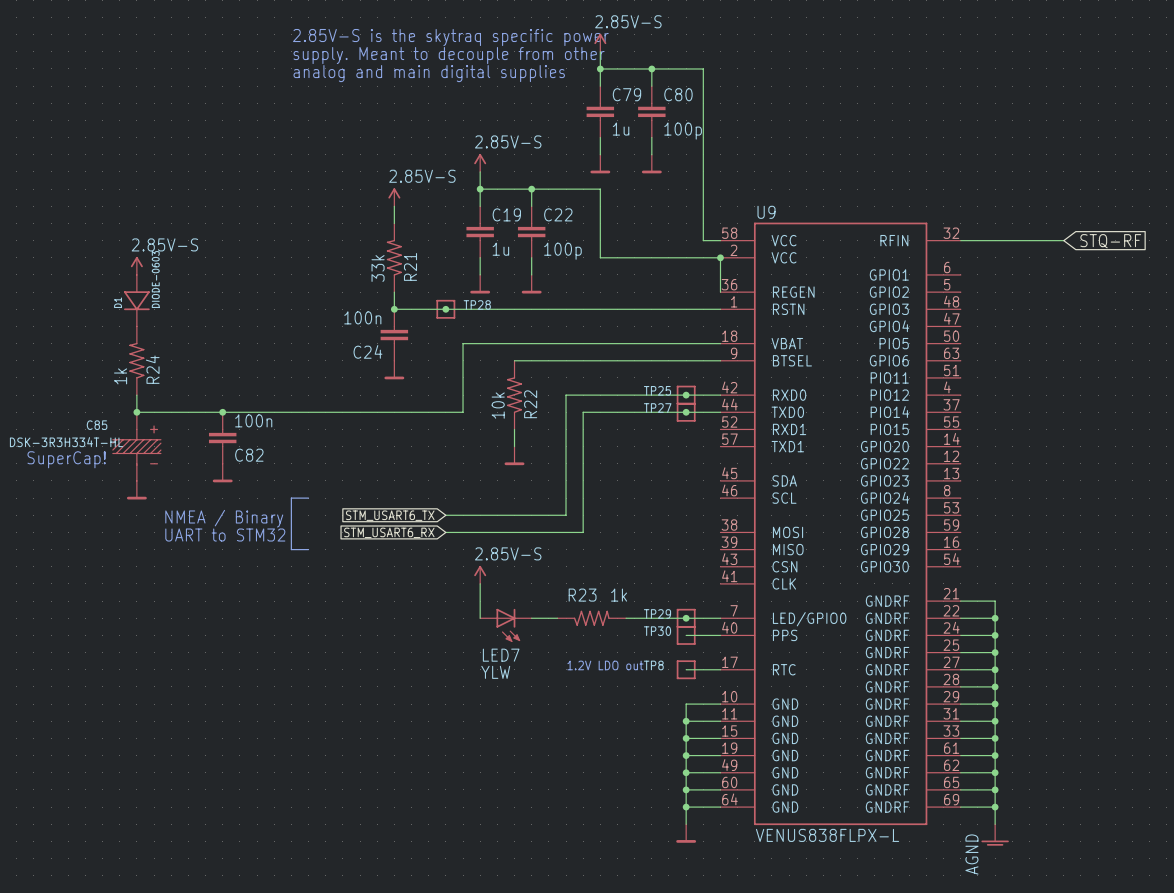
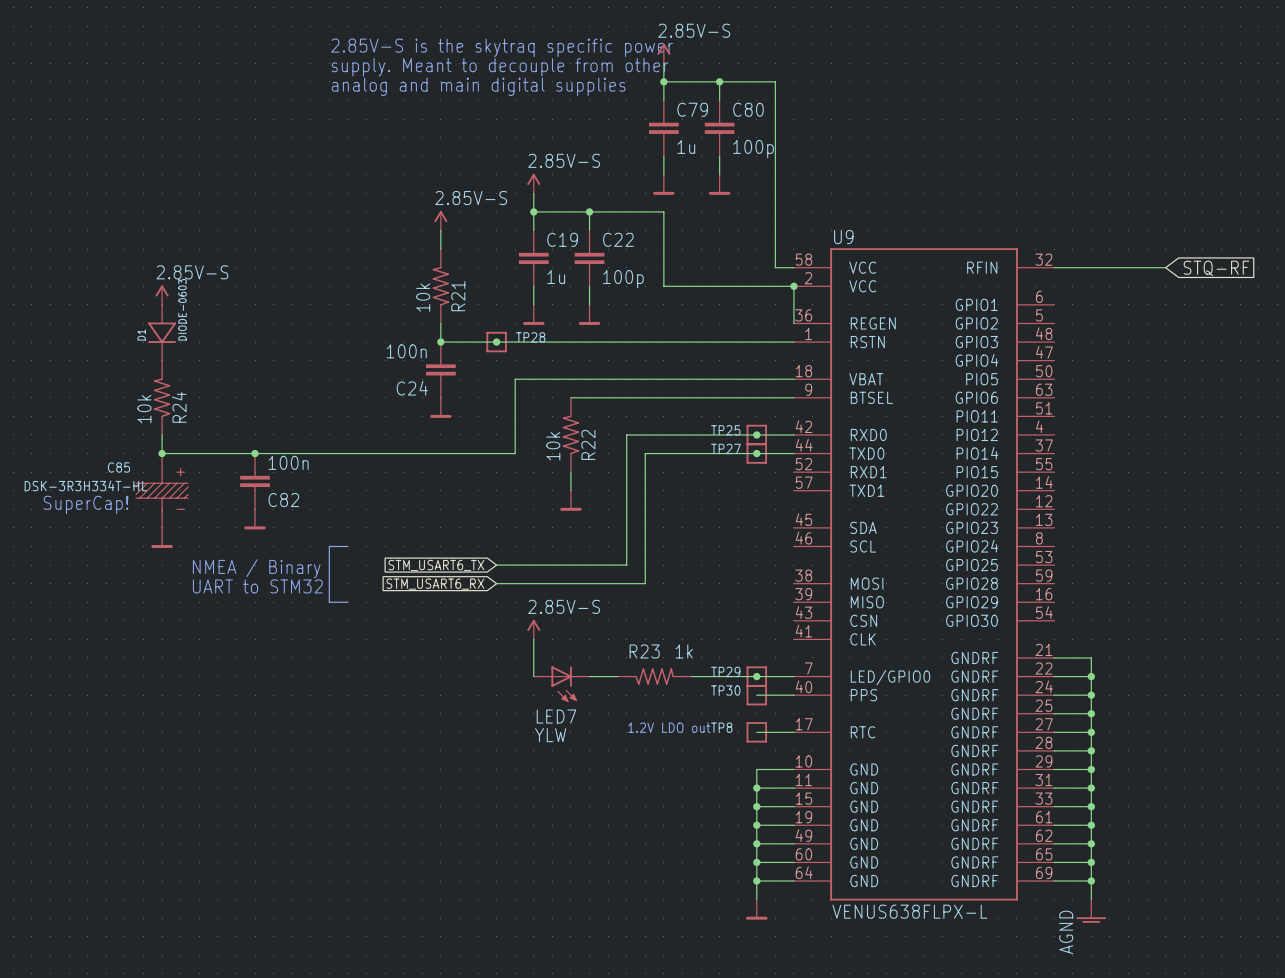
R21 value: 33k (378, 268) -> 10k (423, 297)
R24 value: 1k (120, 376) -> 10k (144, 409)
U9 value: VENUS838FLPX-L (827, 835) -> VENUS638FLPX-L (909, 911)

